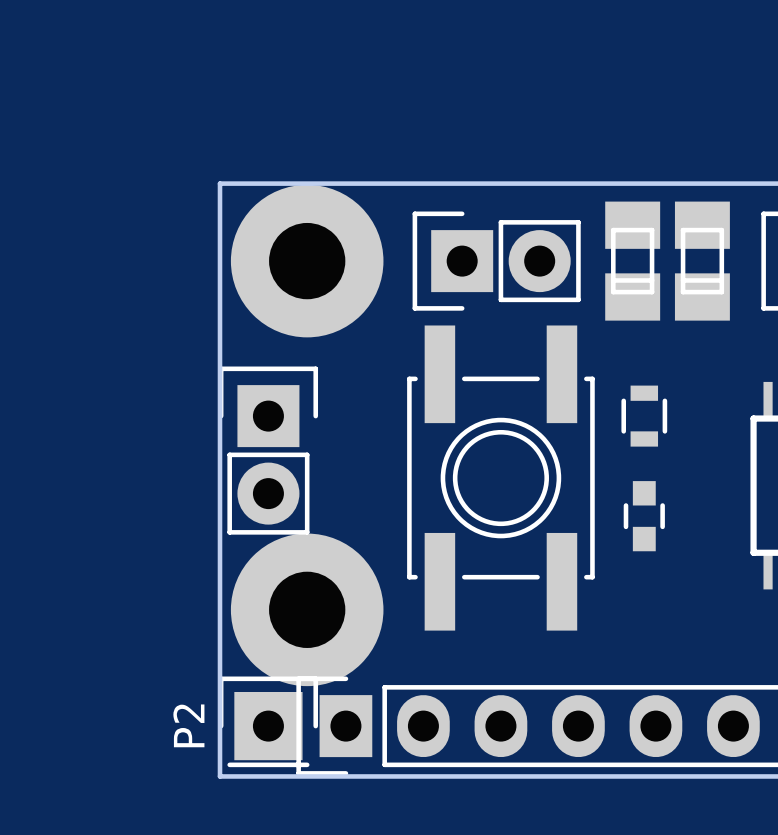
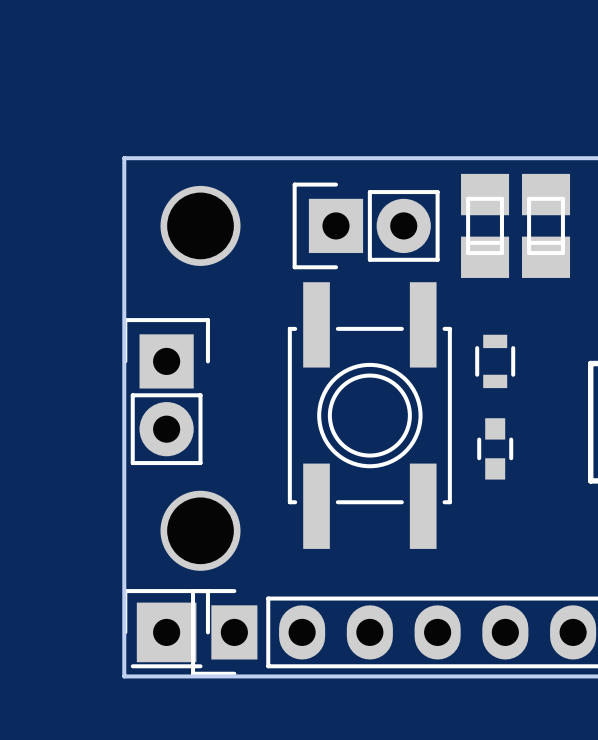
part footprint: [230, 184, 384, 338] -> [160, 185, 241, 266]
part footprint: [230, 533, 384, 687] -> [160, 490, 241, 571]
P2 name: P2 (188, 725) -> none

